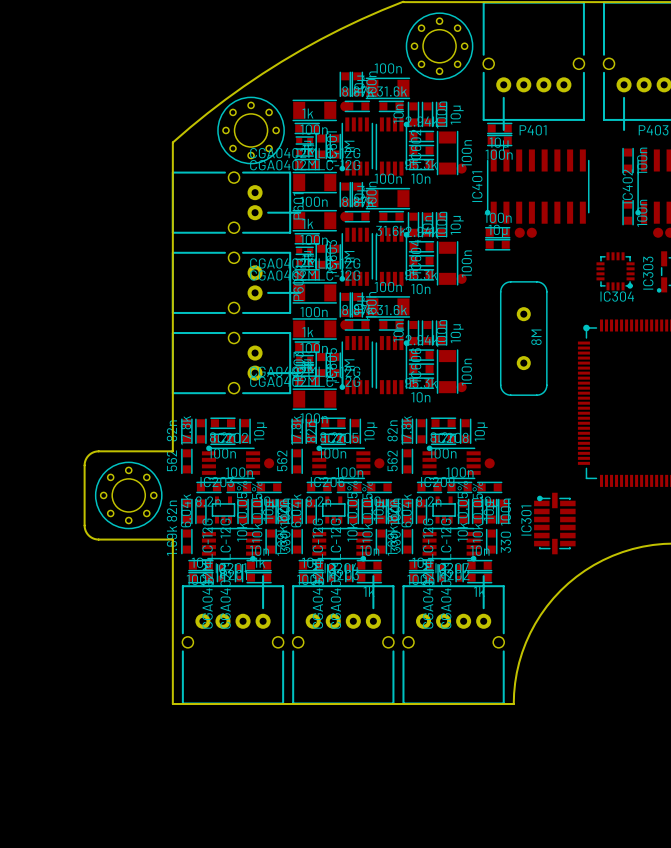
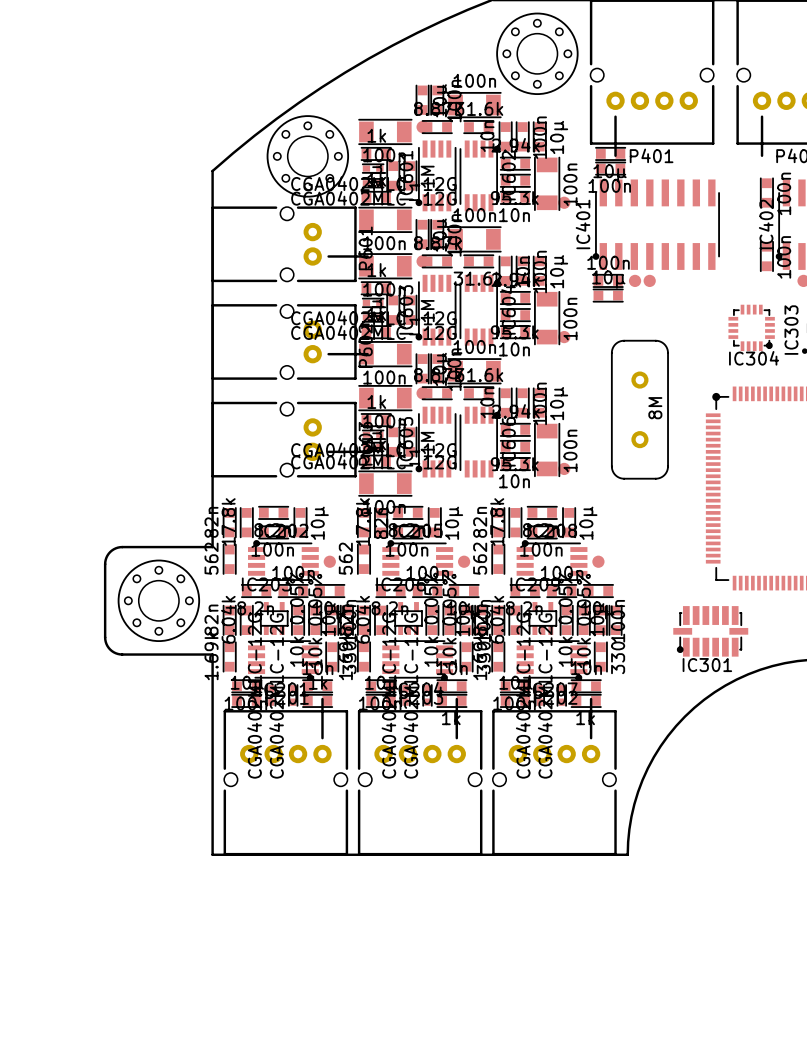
IC301 rotation: 0° (554, 523) -> 90° counterclockwise (710, 631)

